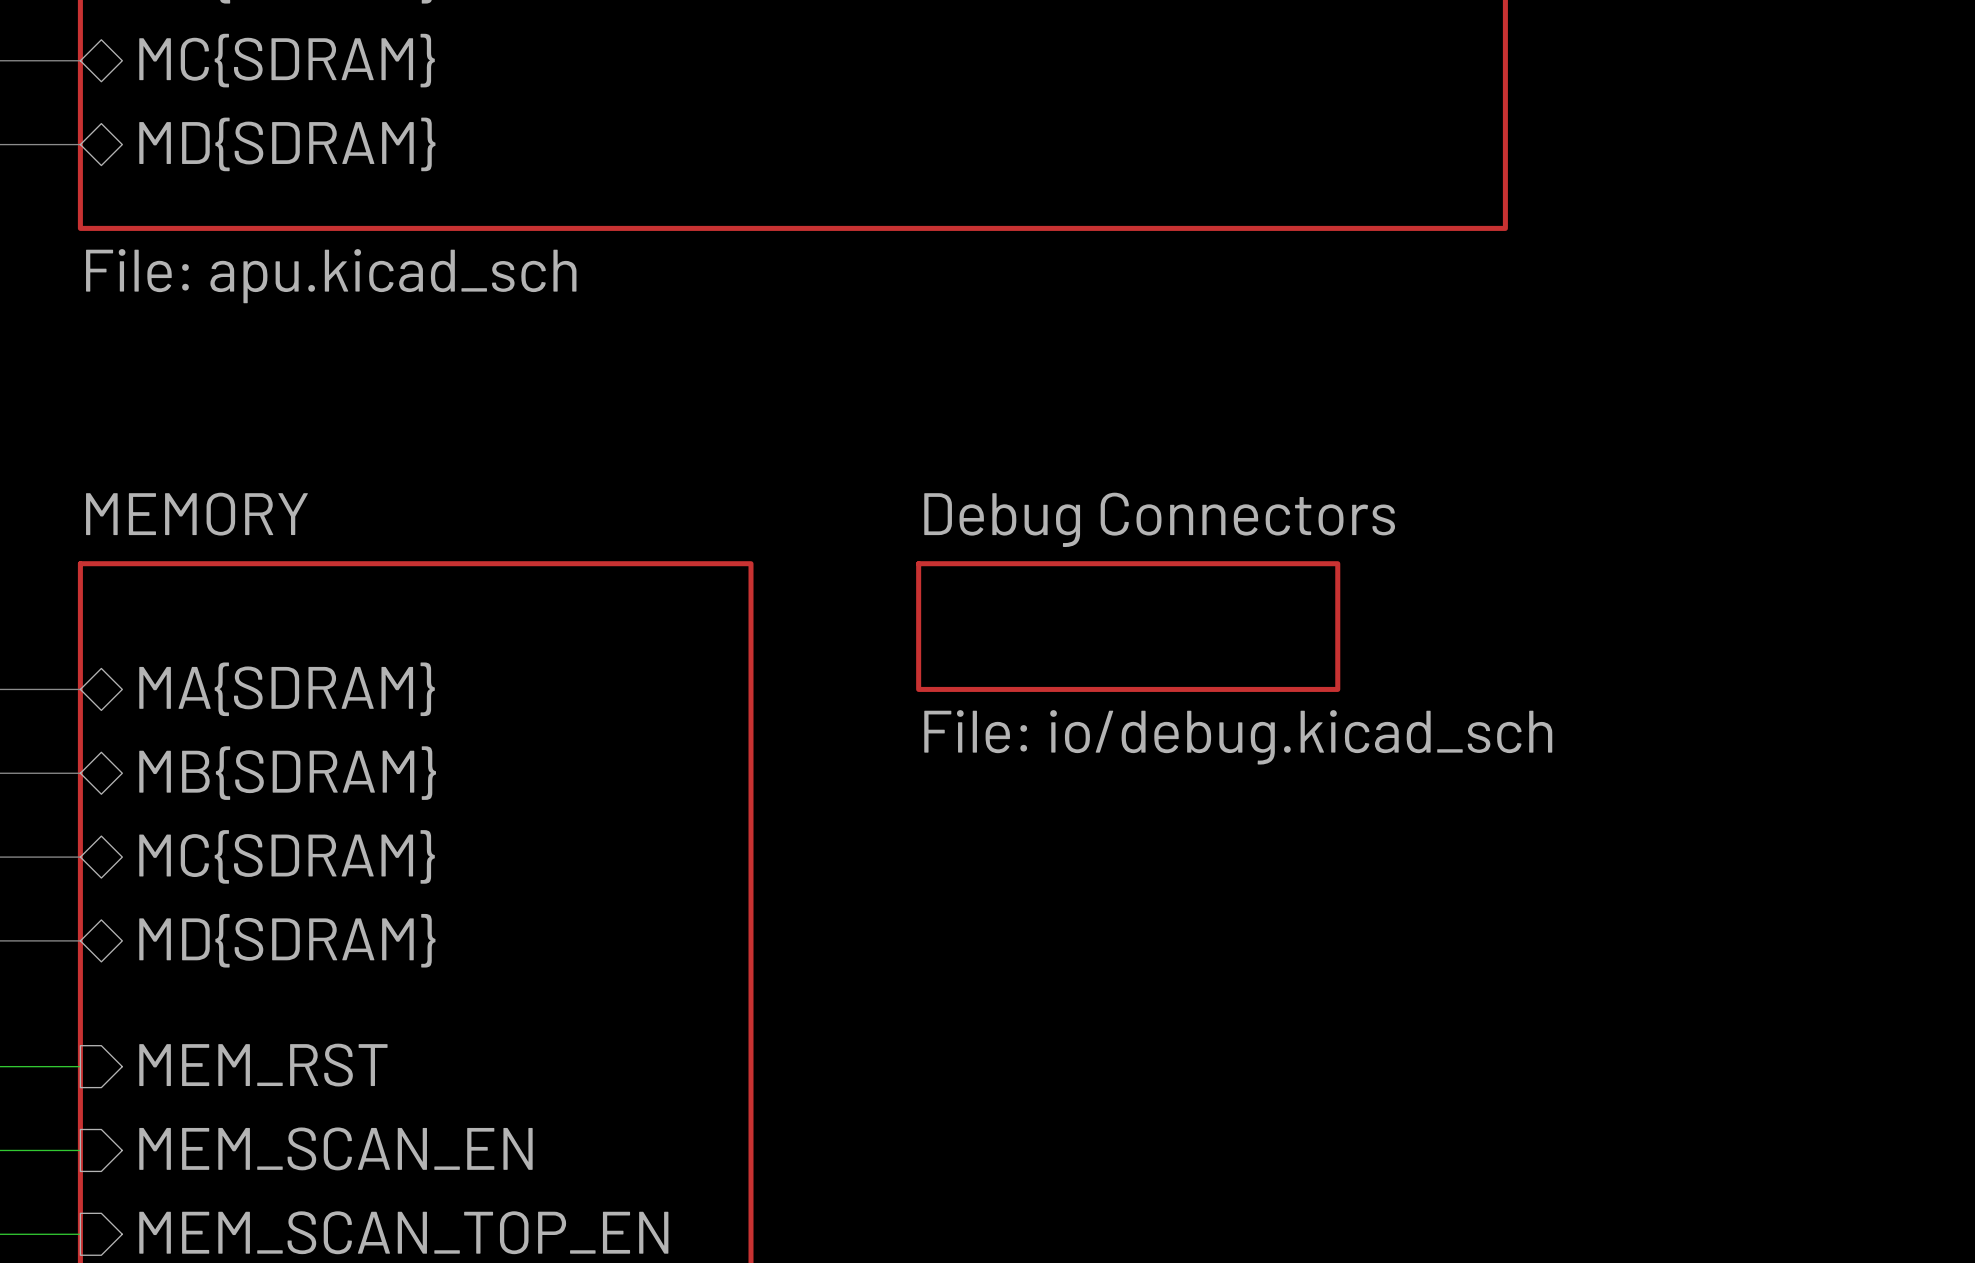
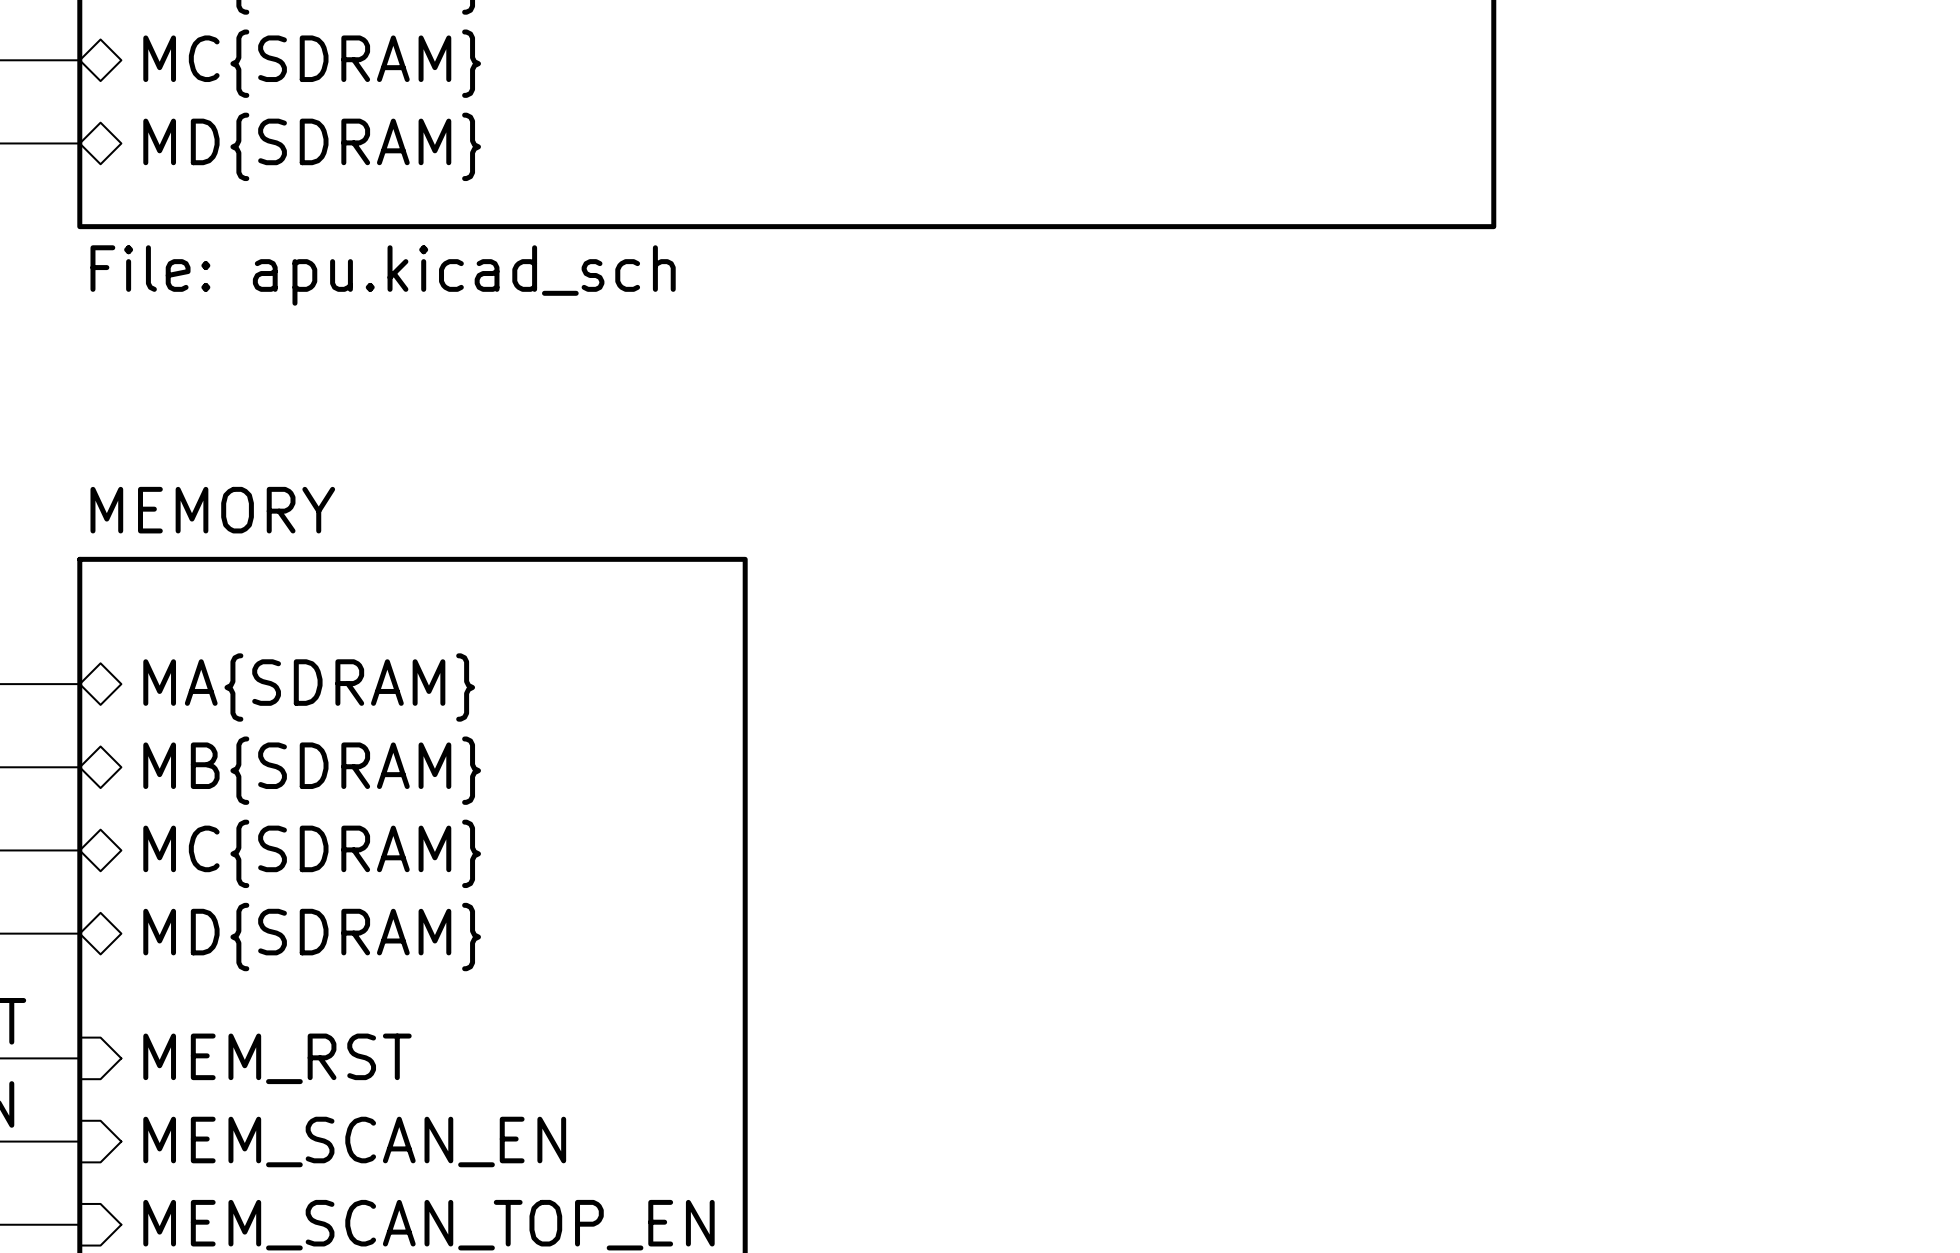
sheet Debug Connectors: File: io/debug.kicad_sch (1128, 626) -> none

